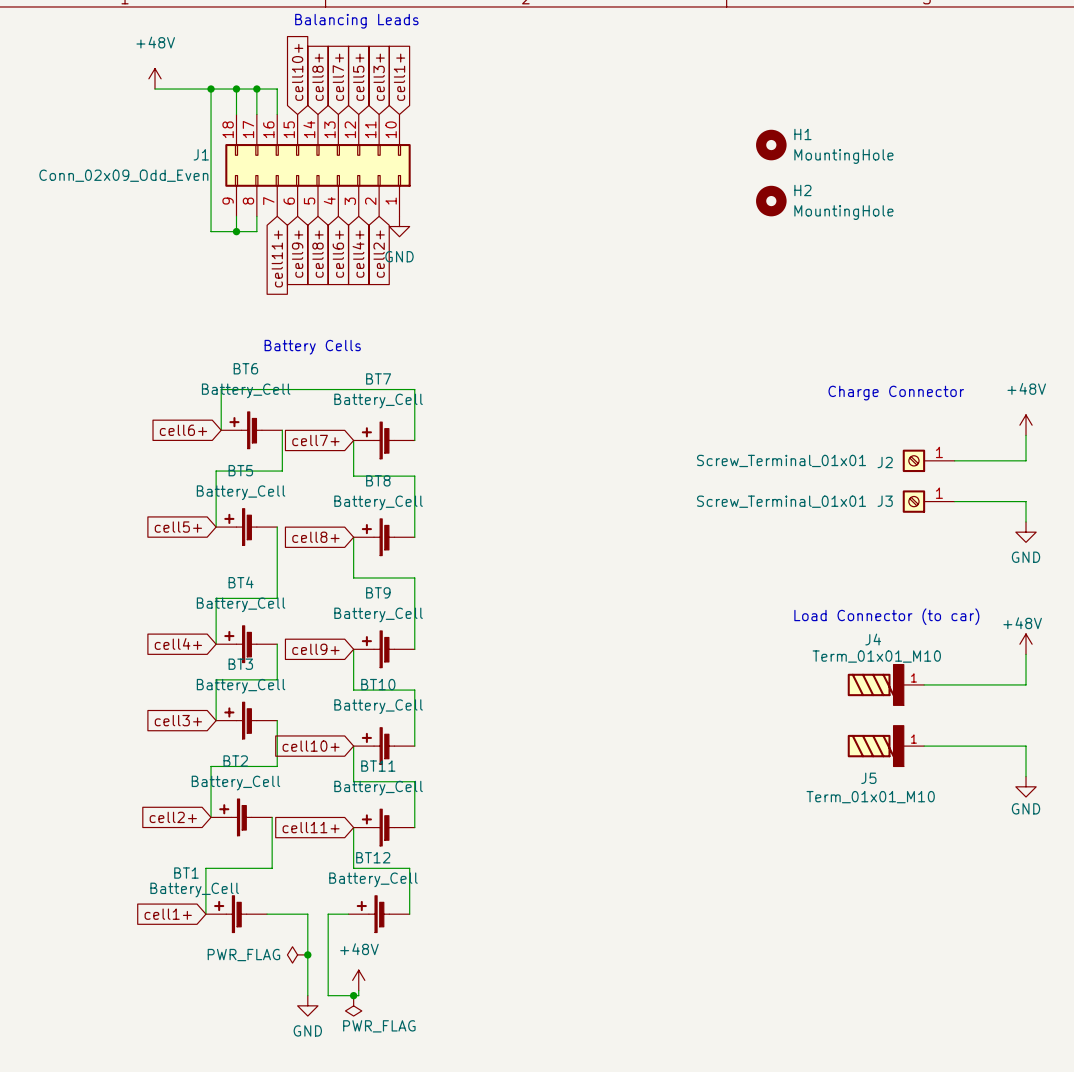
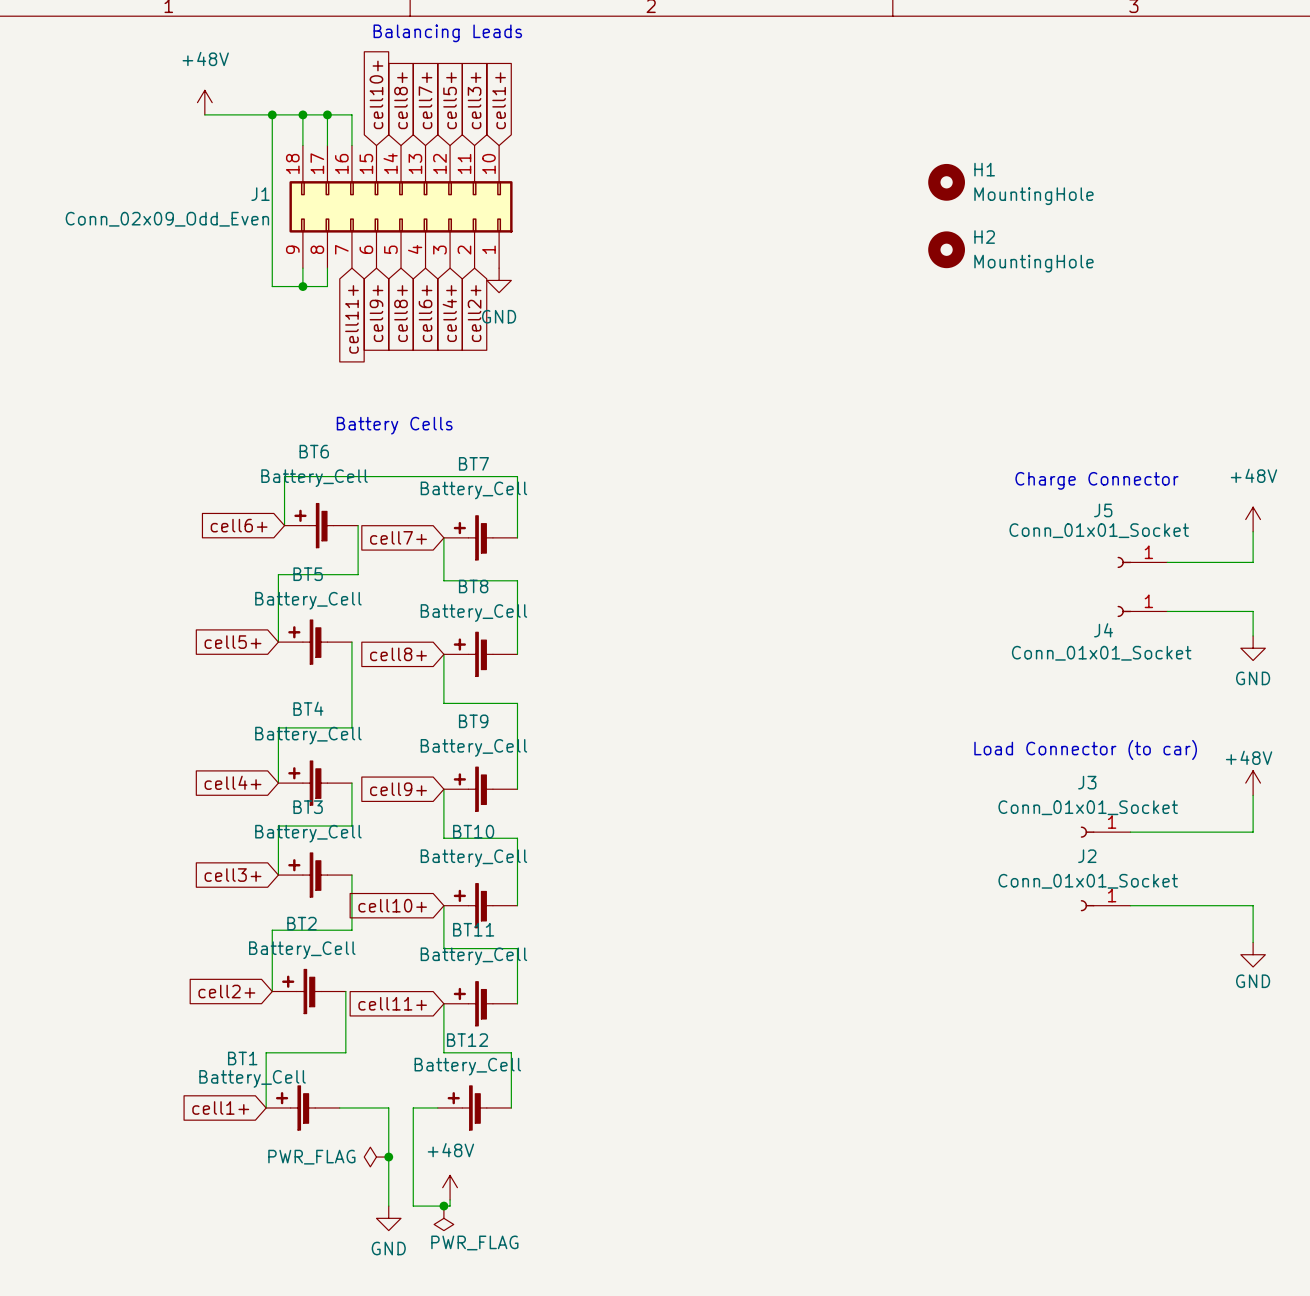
J2 symbol: [902, 449, 955, 473] -> [1080, 900, 1131, 912]
J2 value: Screw_Terminal_01x01 (781, 460) -> Conn_01x01_Socket (1088, 881)
J2 name position: J2 (885, 462) -> J2 (1087, 856)
J3 symbol: [902, 490, 955, 513] -> [1080, 826, 1131, 838]
J3 value: Screw_Terminal_01x01 (781, 501) -> Conn_01x01_Socket (1088, 807)
J3 name position: J3 (885, 501) -> J3 (1087, 782)
J4 name position: J4 (873, 639) -> J4 (1103, 630)
J4 value: Term_01x01_M10 (876, 656) -> Conn_01x01_Socket (1101, 653)
J4 symbol: [847, 664, 925, 706] -> [1117, 605, 1168, 618]
J5 symbol: [847, 725, 925, 767] -> [1117, 556, 1168, 569]
J5 name position: J5 (868, 778) -> J5 (1103, 510)
J5 value: Term_01x01_M10 (870, 797) -> Conn_01x01_Socket (1099, 530)

